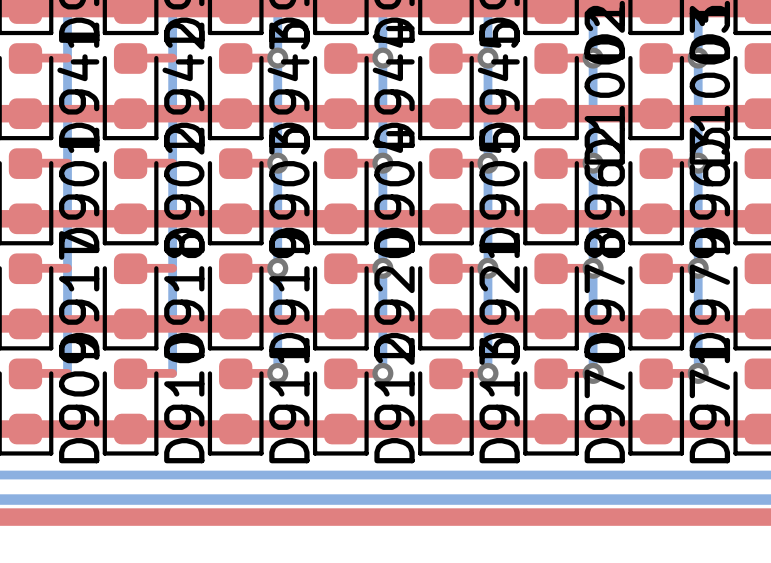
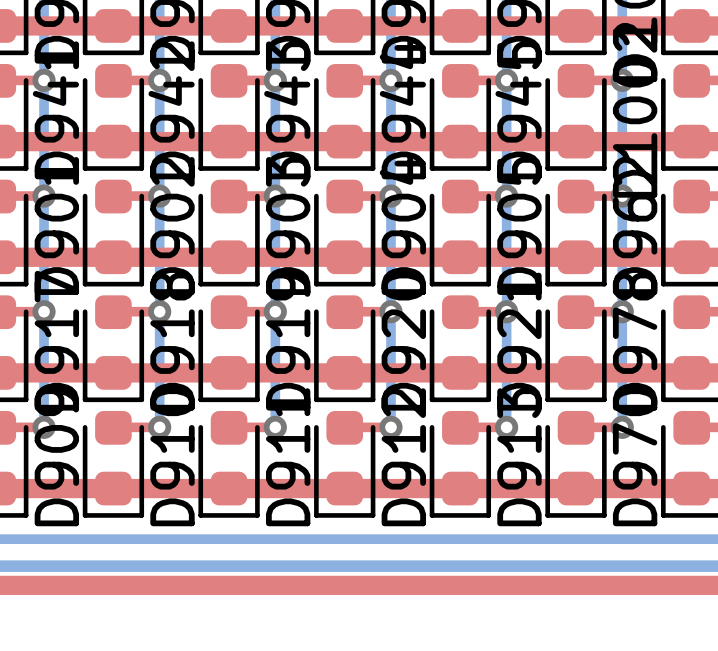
via: none -> (44, 80)
via: none -> (159, 80)
via: none -> (44, 196)
via: none -> (159, 196)
via: none -> (44, 311)
via: none -> (159, 311)
via: none -> (44, 427)
via: none -> (159, 427)

